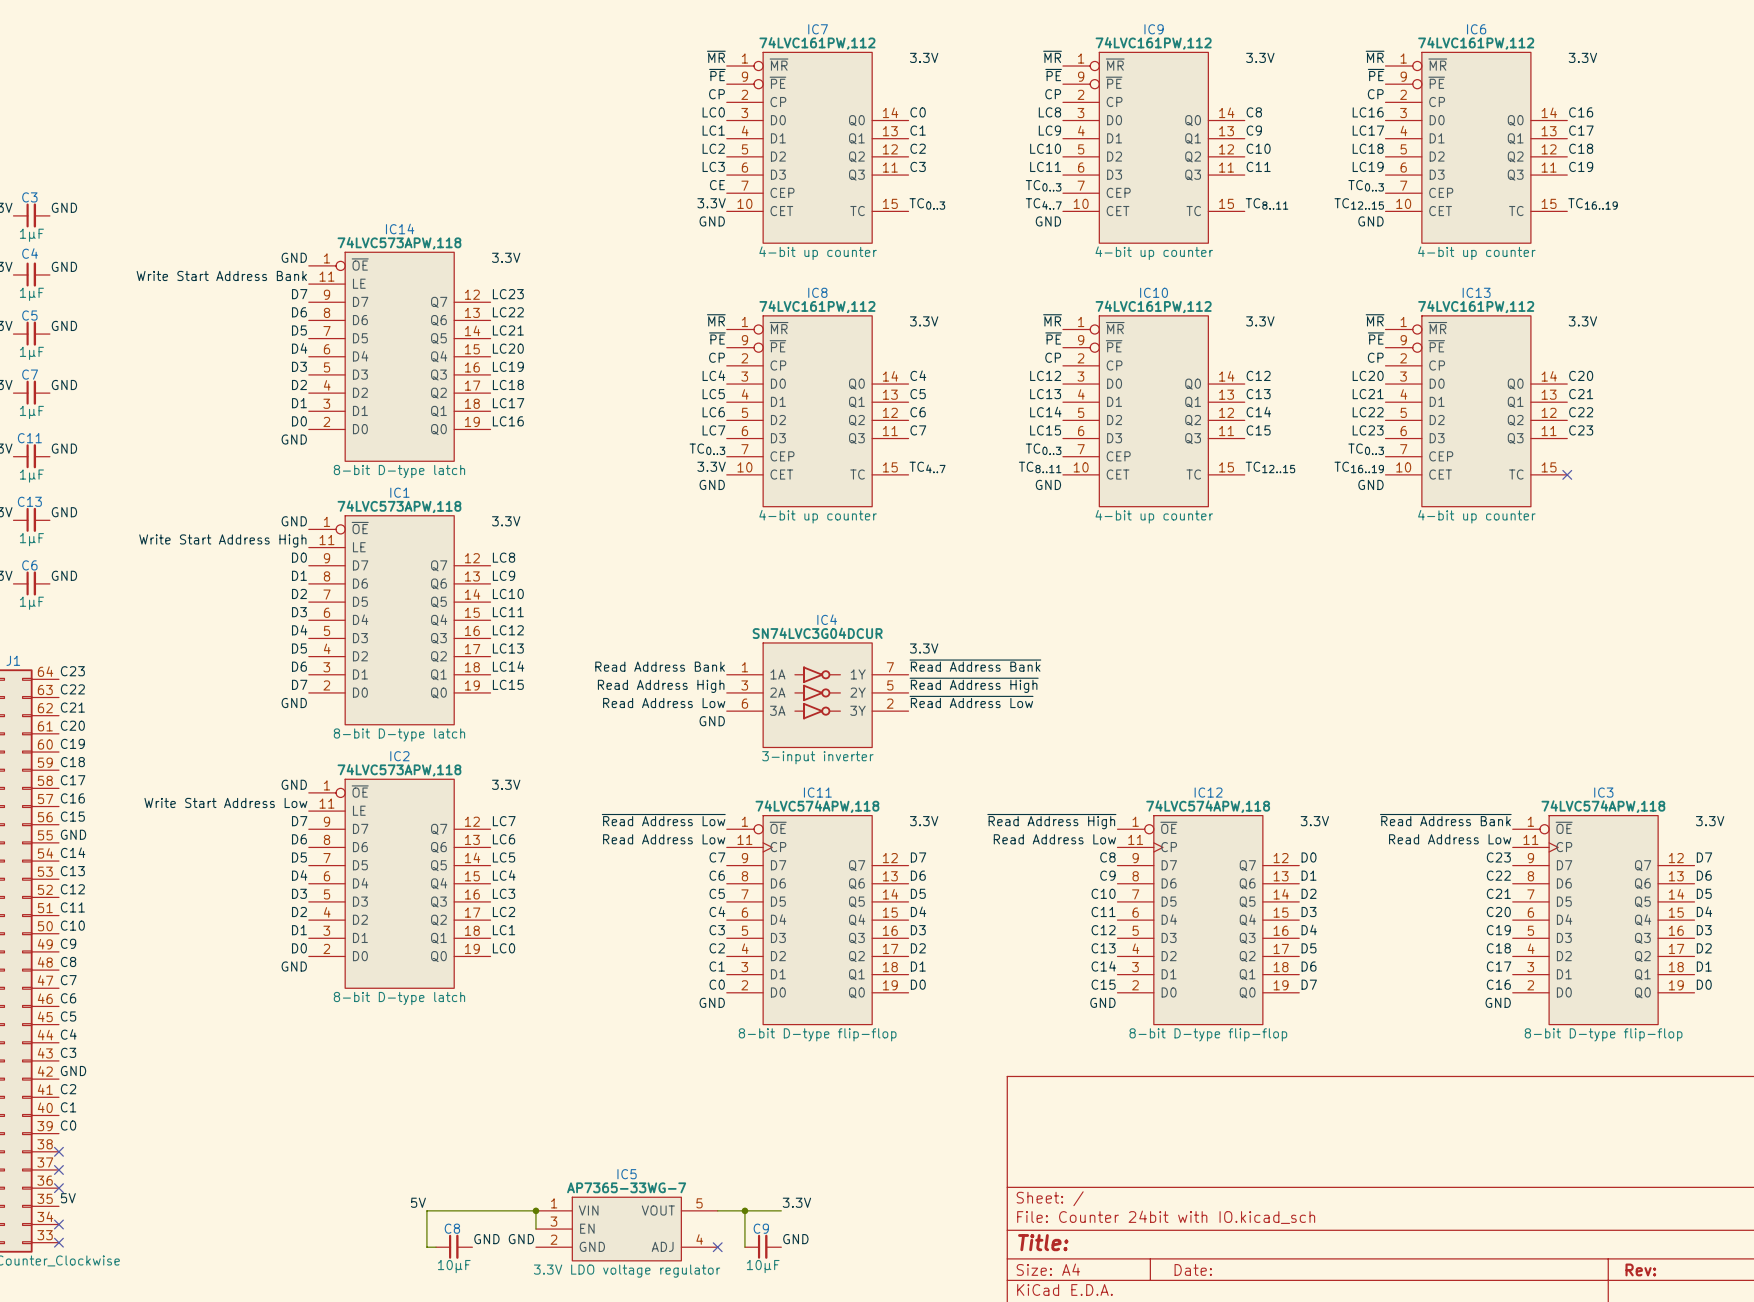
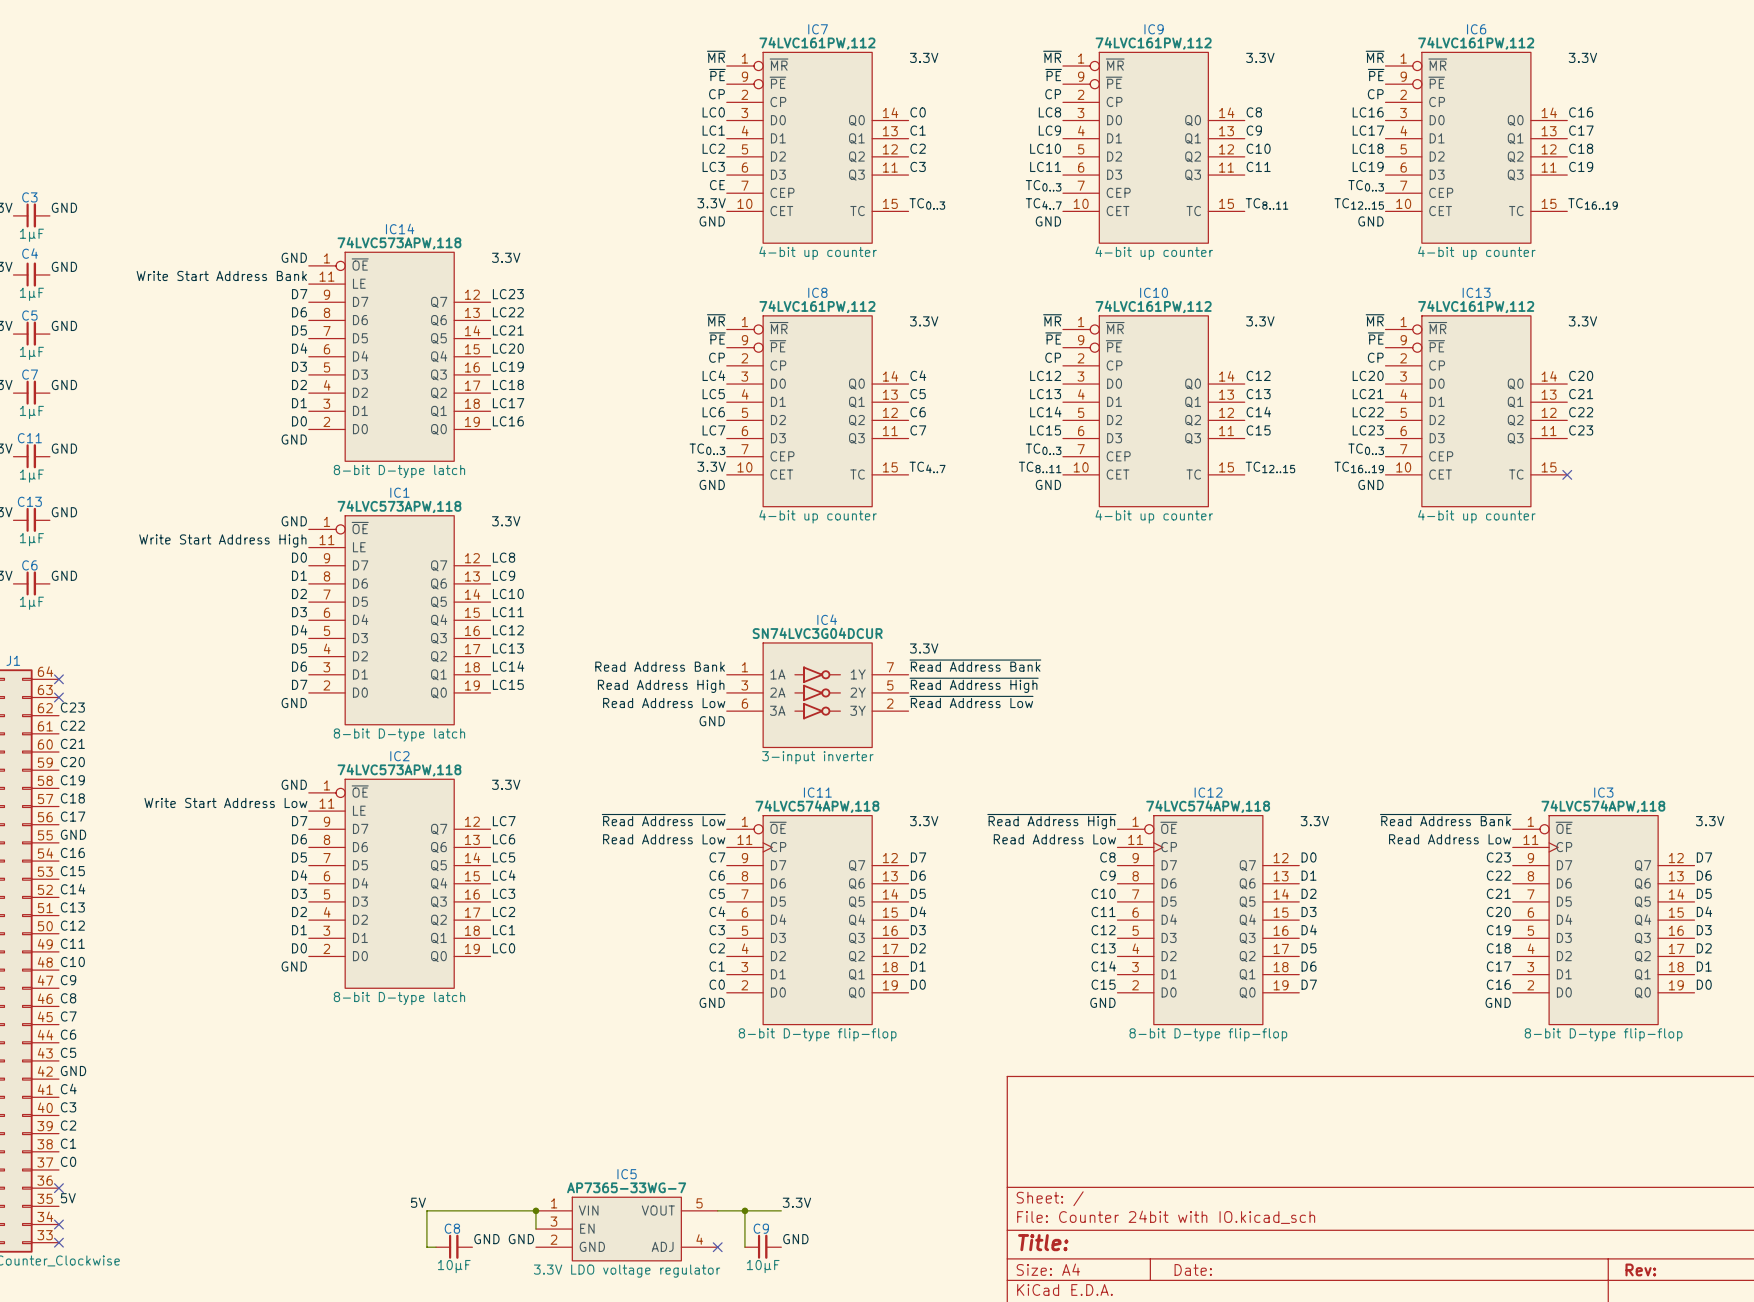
label: C23 (72, 671) -> none
no-connect mark: none -> (58, 679)
label: C22 (72, 689) -> none
no-connect mark: none -> (58, 697)
label: C21 (72, 707) -> C23 (72, 707)
label: C20 (72, 725) -> C22 (72, 725)
label: C19 (72, 743) -> C21 (72, 743)
label: C18 (72, 762) -> C20 (72, 762)
label: C17 (73, 780) -> C19 (72, 780)
label: C16 (72, 798) -> C18 (72, 798)
label: C15 (72, 816) -> C17 (73, 816)
label: C14 (73, 852) -> C16 (72, 852)
label: C13 (72, 871) -> C15 (72, 871)
label: C12 (72, 889) -> C14 (73, 889)
label: C11 (72, 907) -> C13 (72, 907)
label: C10 (72, 925) -> C12 (72, 925)
label: C9 (68, 943) -> C11 (72, 943)
label: C8 (68, 961) -> C10 (72, 961)
label: C7 (68, 980) -> C9 (68, 980)
label: C6 (68, 998) -> C8 (68, 998)
label: C5 (68, 1016) -> C7 (68, 1016)
label: C4 (68, 1034) -> C6 (68, 1034)
label: C3 (68, 1052) -> C5 (68, 1052)
label: C2 (68, 1089) -> C4 (68, 1088)
label: C1 (68, 1107) -> C3 (68, 1107)
label: C0 (68, 1125) -> C2 (68, 1125)
label: none -> C1 (68, 1143)
no-connect mark: (58, 1151) -> none
label: none -> C0 (68, 1161)
no-connect mark: (58, 1169) -> none

